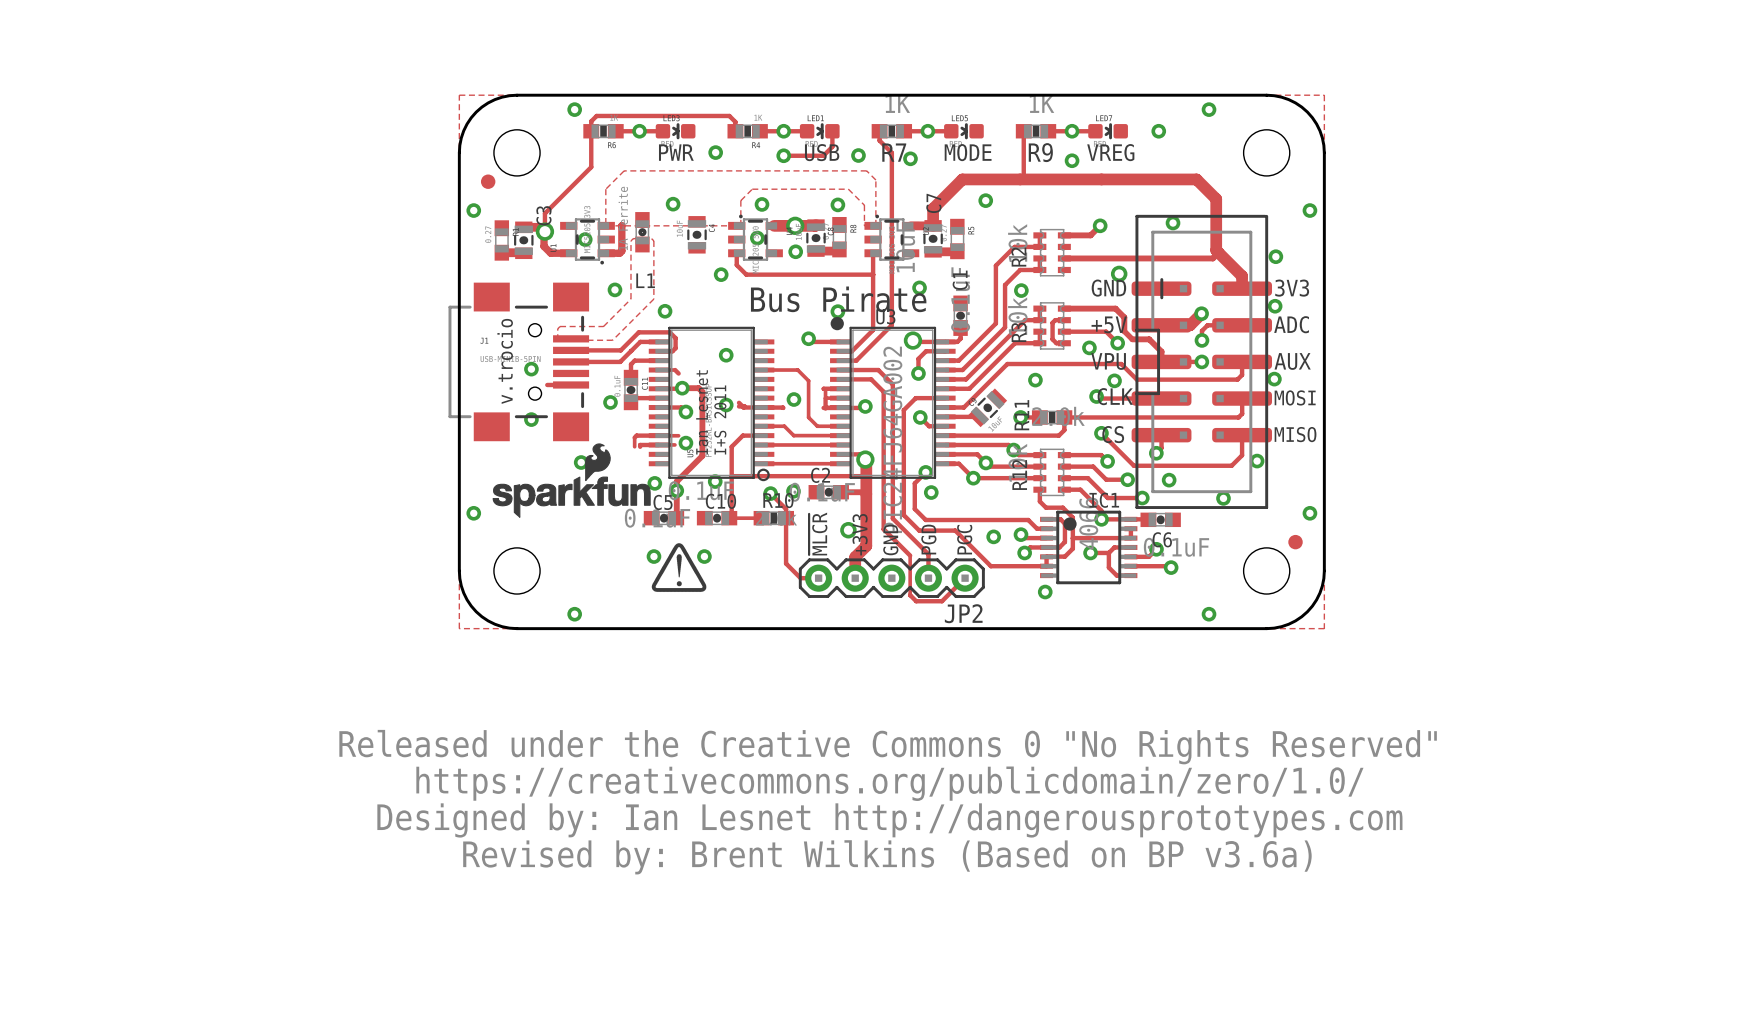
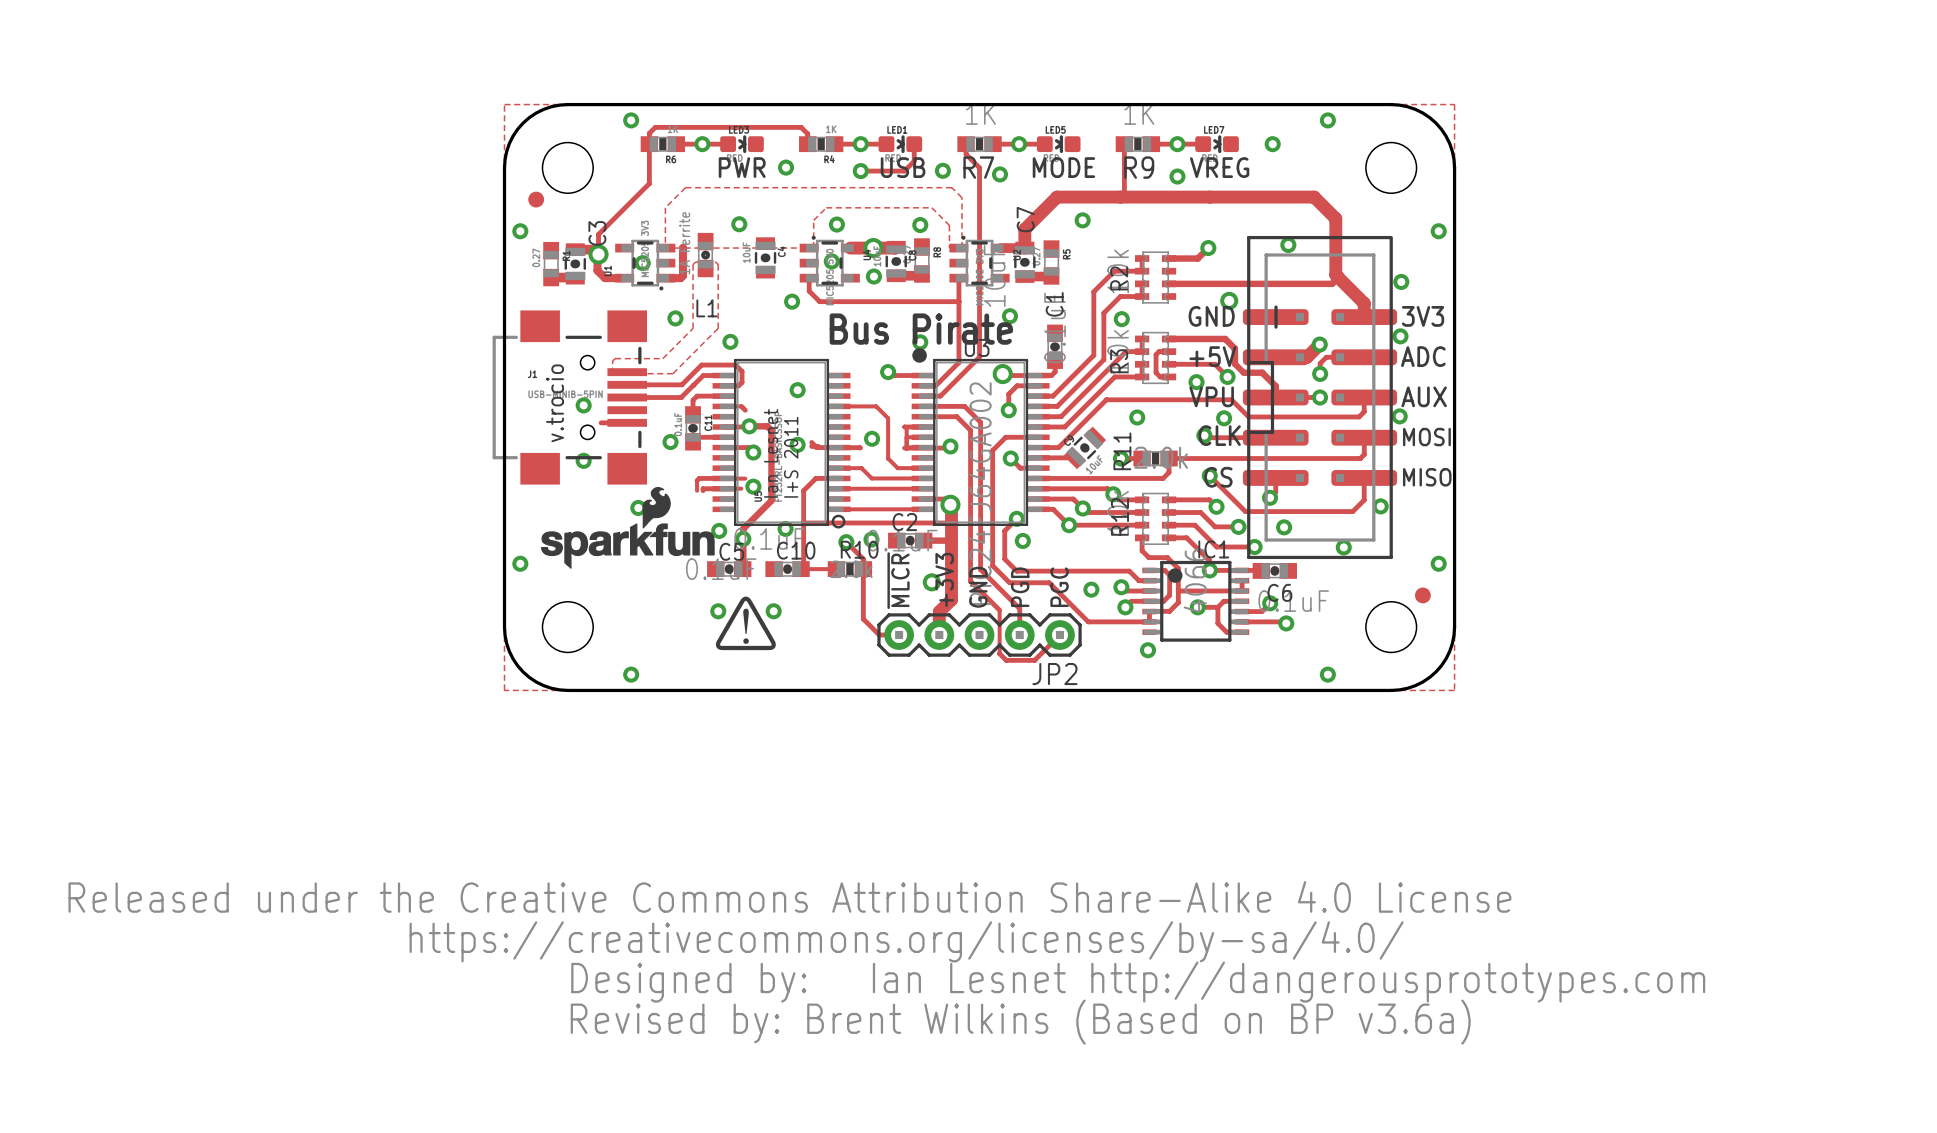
text: Released under the Creative Commons 0 "No Rights Reserved" (888, 747) -> none
text: https://creativecommons.org/publicdomain/zero/1.0/ (889, 783) -> none
drawing: none -> [68, 881, 1512, 1003]
text: Designed by: Ian Lesnet http://dangerousprototypes.com (889, 820) -> none
text: Revised by: Brent Wilkins (Based on BP v3.6a) (887, 857) -> none
text: none -> Ian Lesnet http://dangerousprototypes.com (1289, 982)
text: none -> Revised by: Brent Wilkins (Based on BP v3.6a) (1020, 1022)

